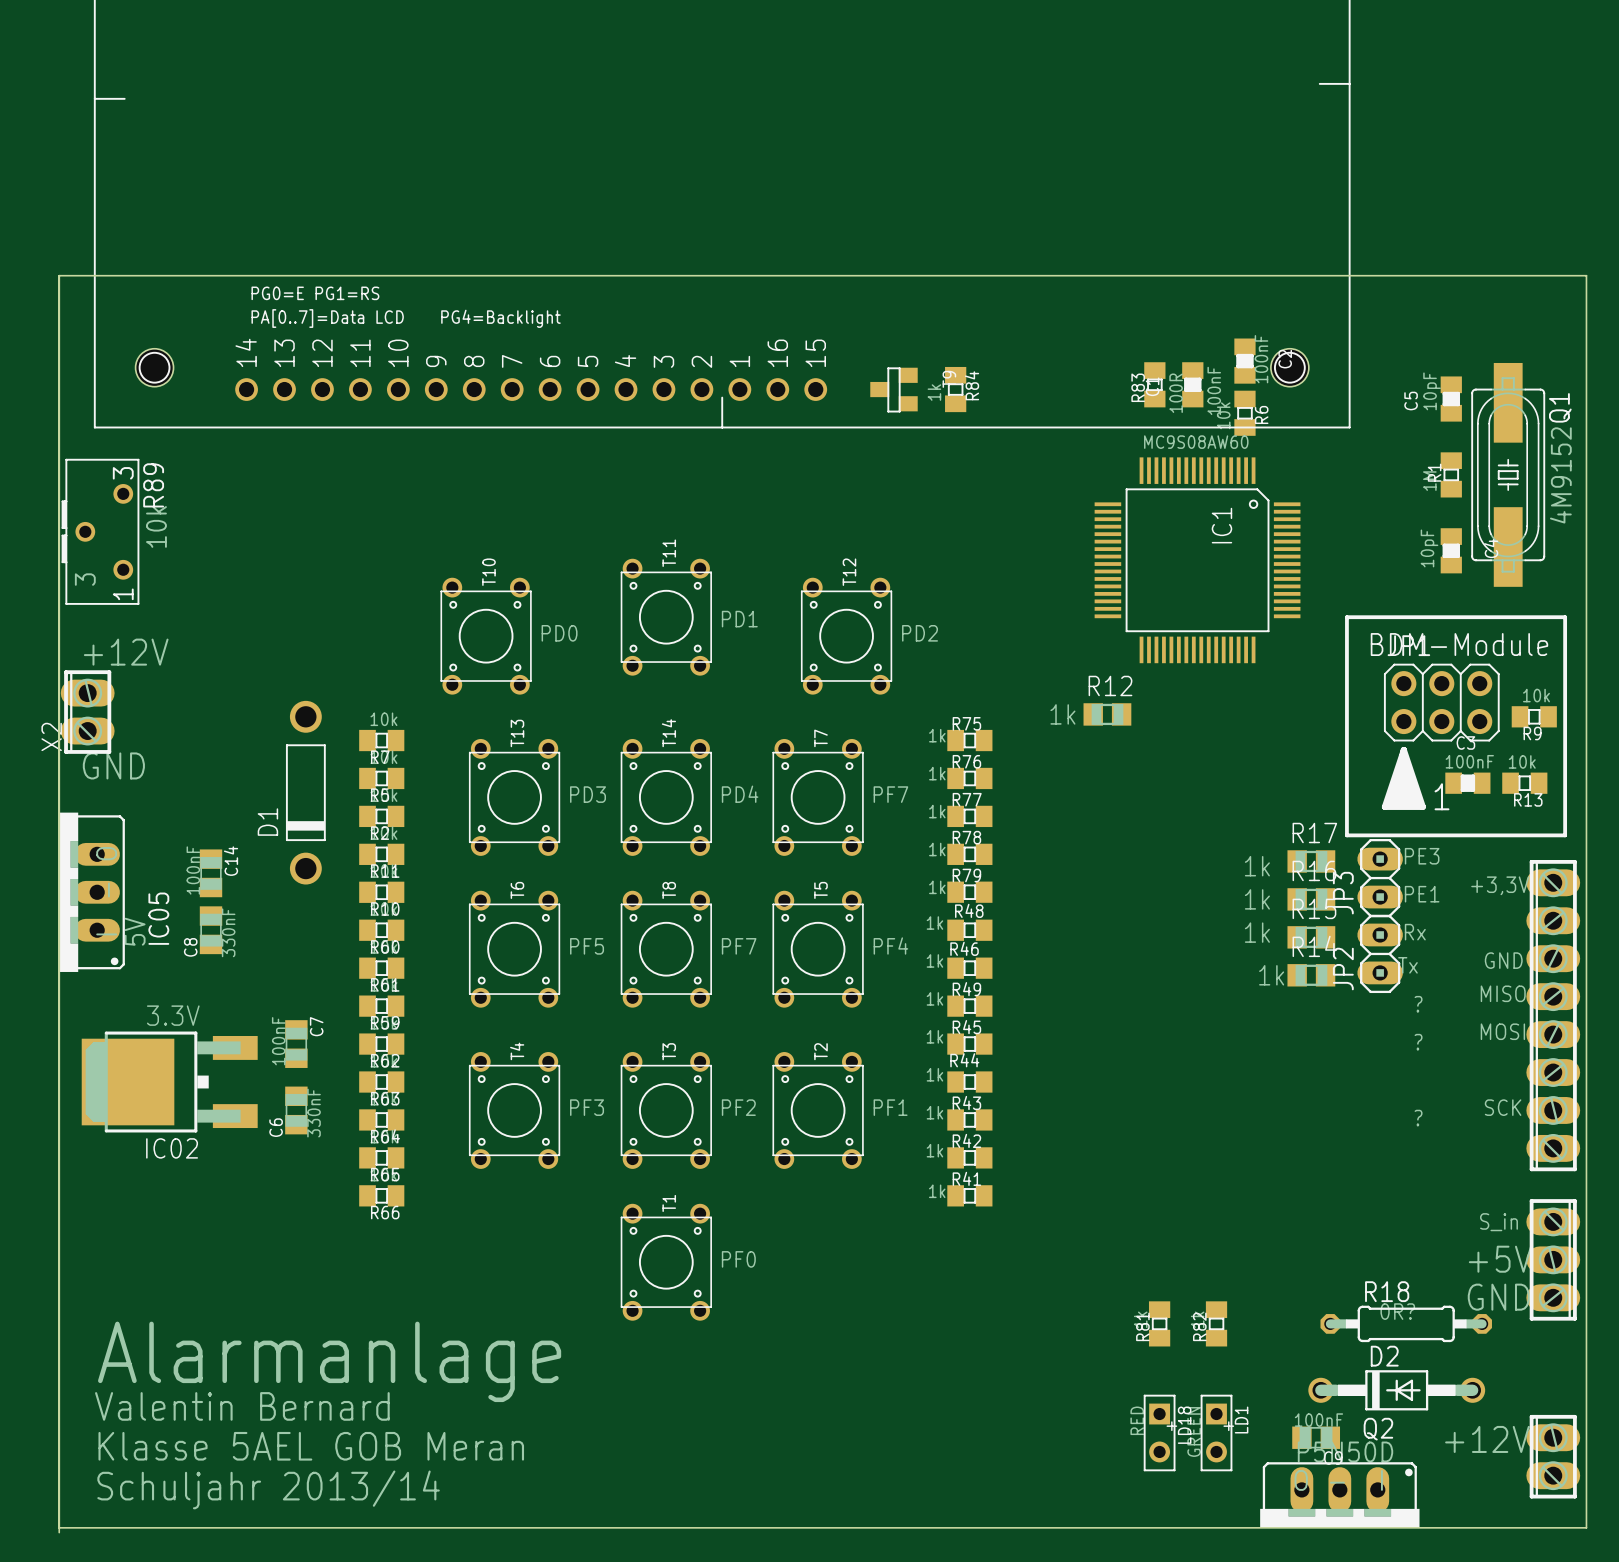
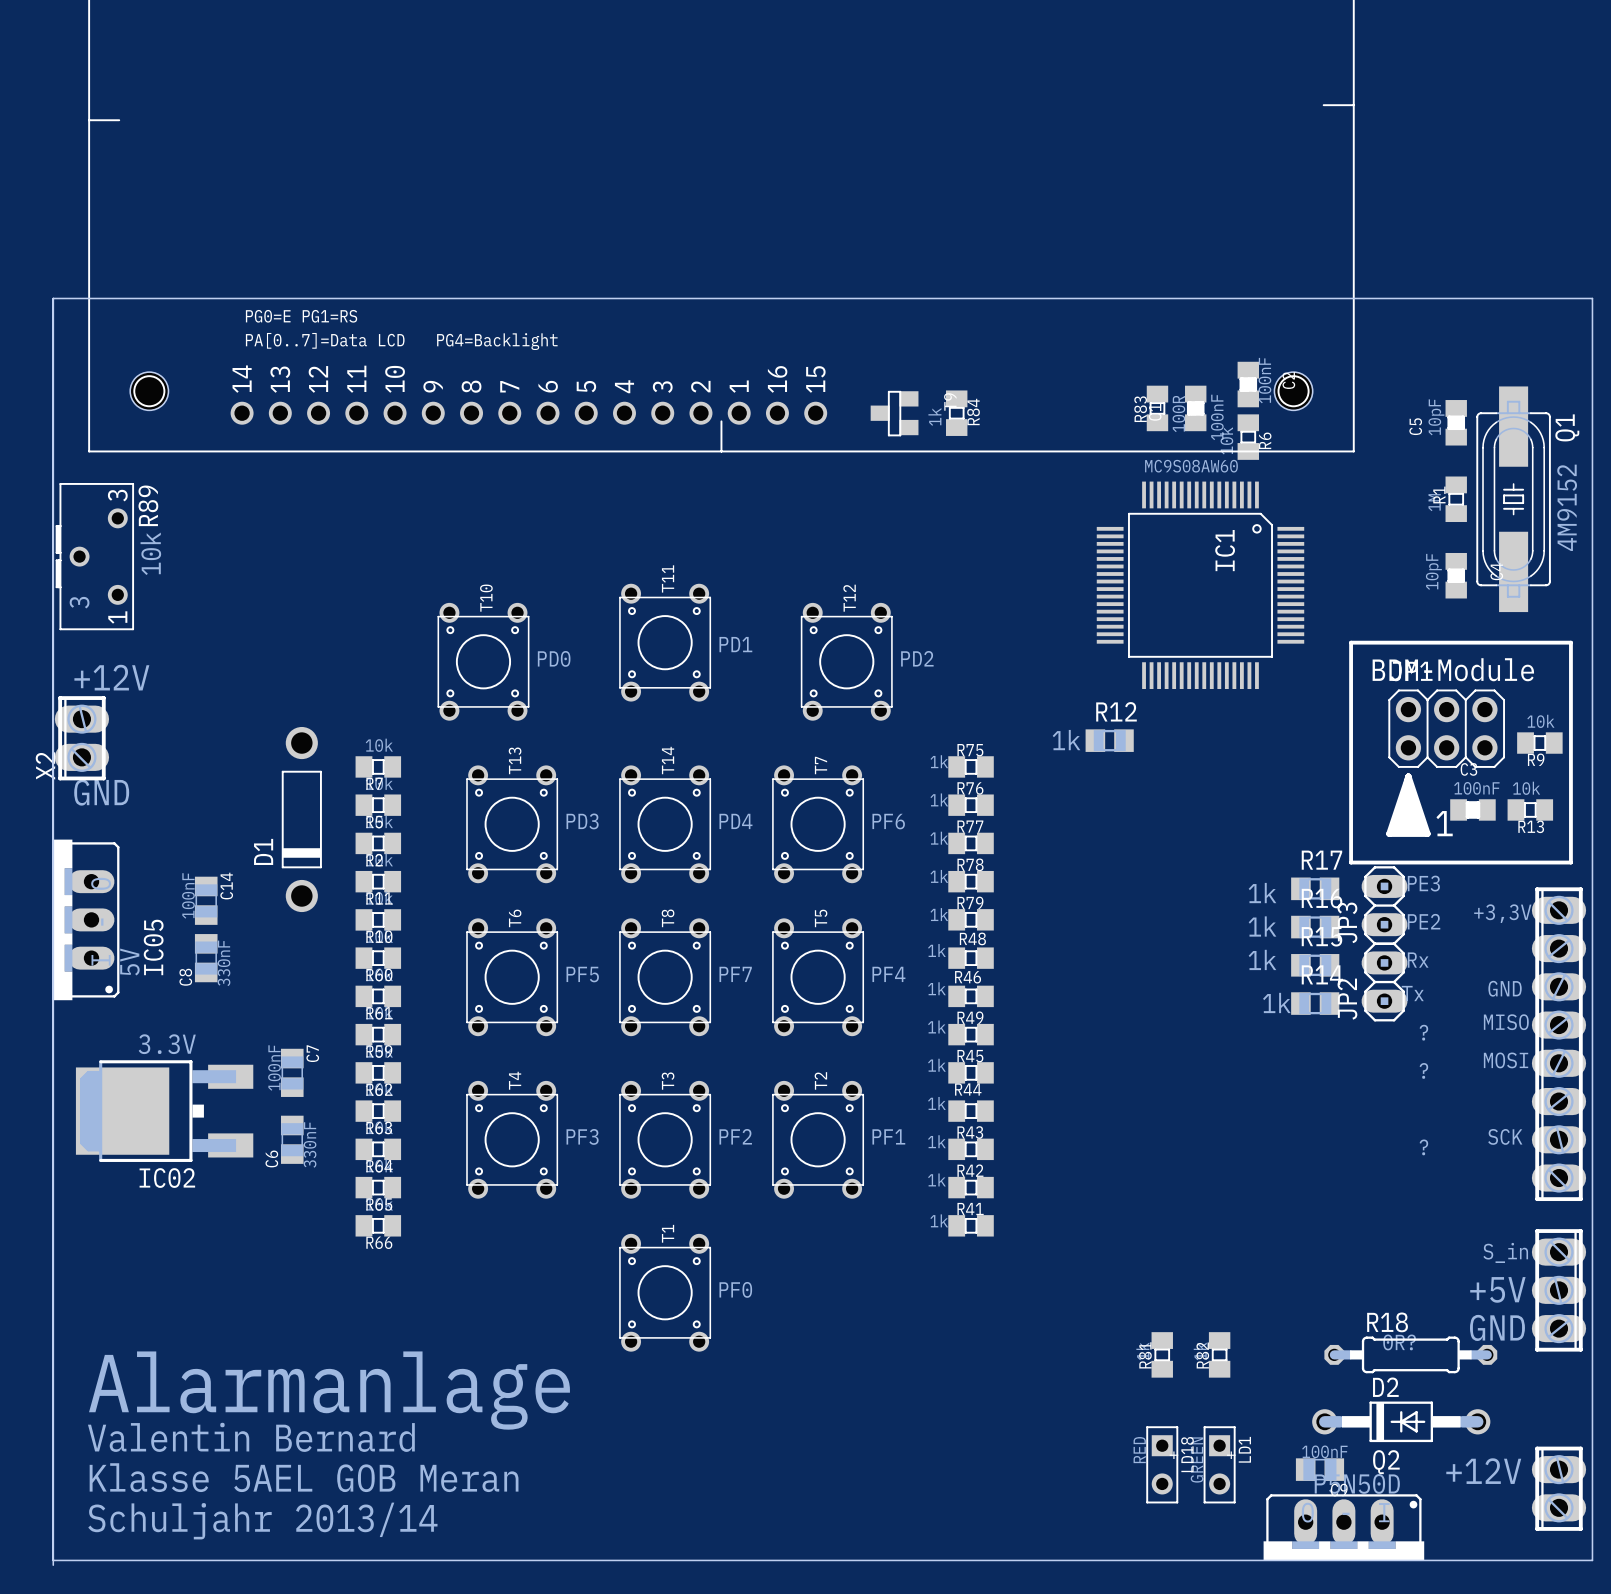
text: PF7 (890, 794) -> PF6 (888, 821)
text: PE1 (1422, 894) -> PE2 (1424, 921)

